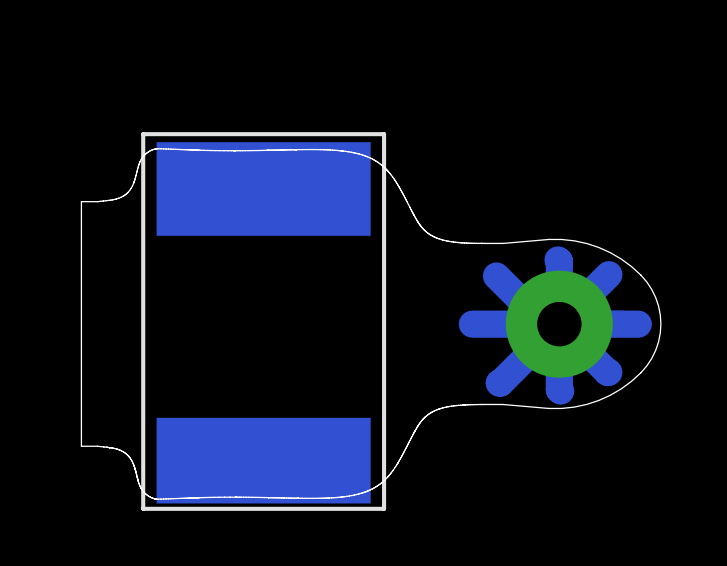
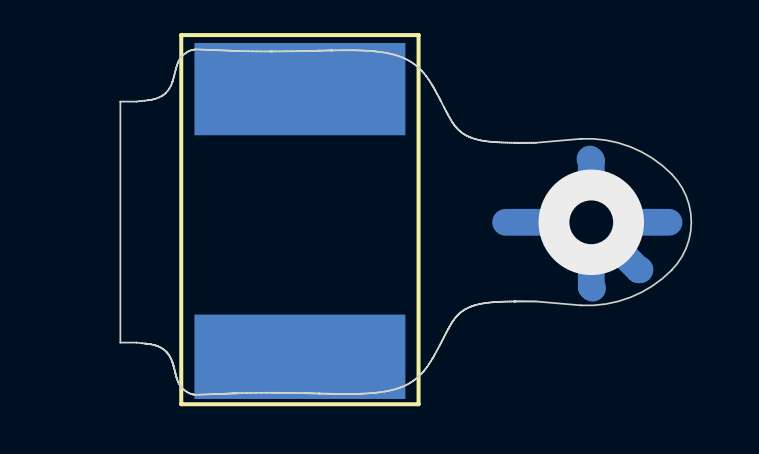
track: (608, 273) (499, 383) -> none
track: (496, 275) (544, 324) -> none

